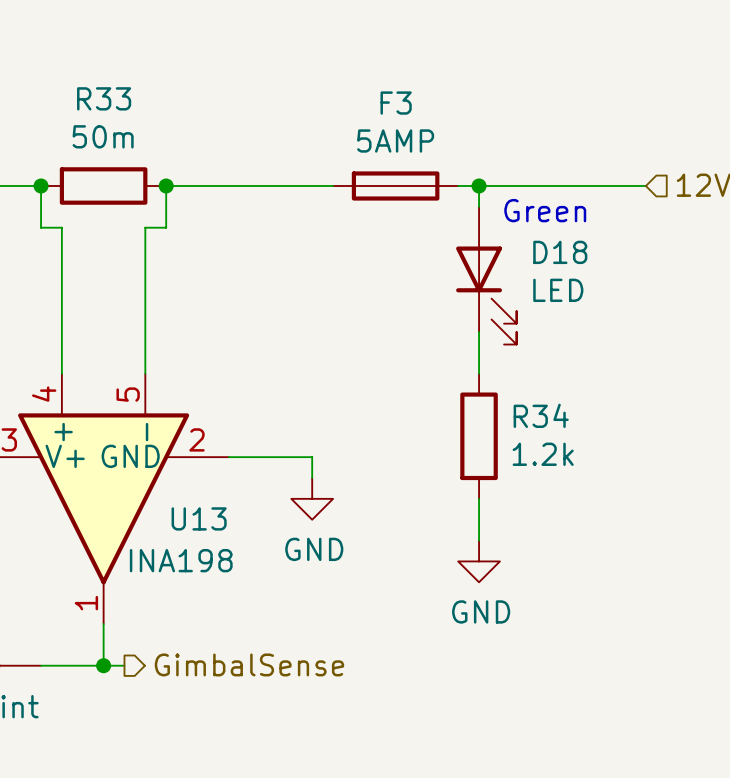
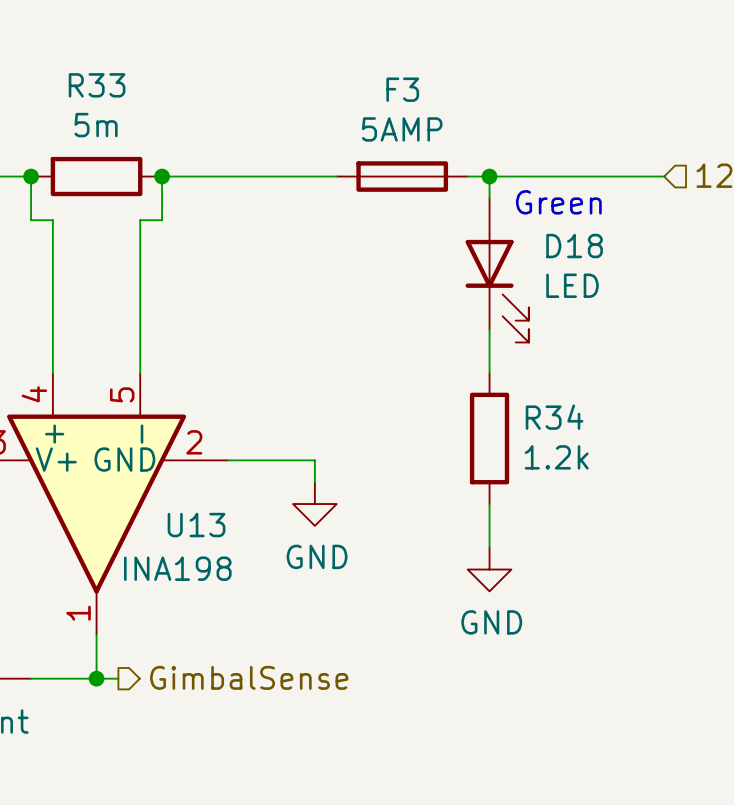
R33 value: 50m (103, 136) -> 5m (96, 125)

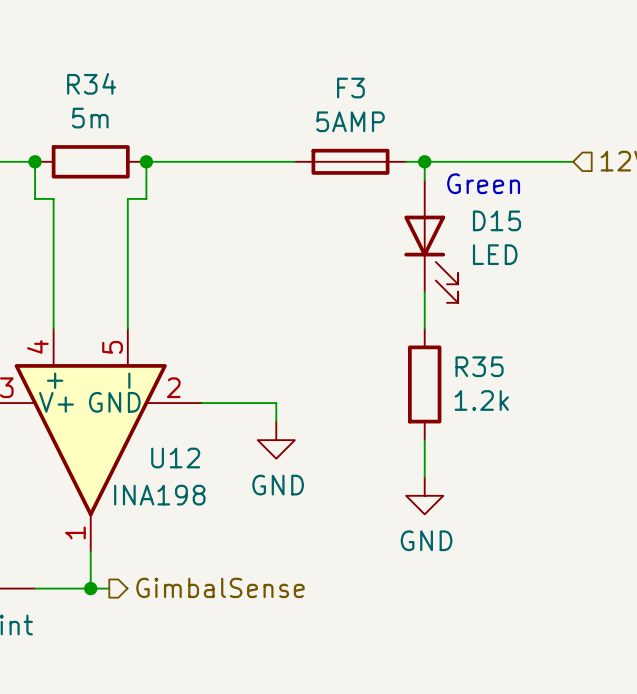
R33 name: R33 (97, 85) -> R34 (91, 83)
D18 name: D18 (574, 246) -> D15 (496, 220)
R34 name: R34 (554, 417) -> R35 (479, 366)
U13 name: U13 (196, 525) -> U12 (175, 458)

